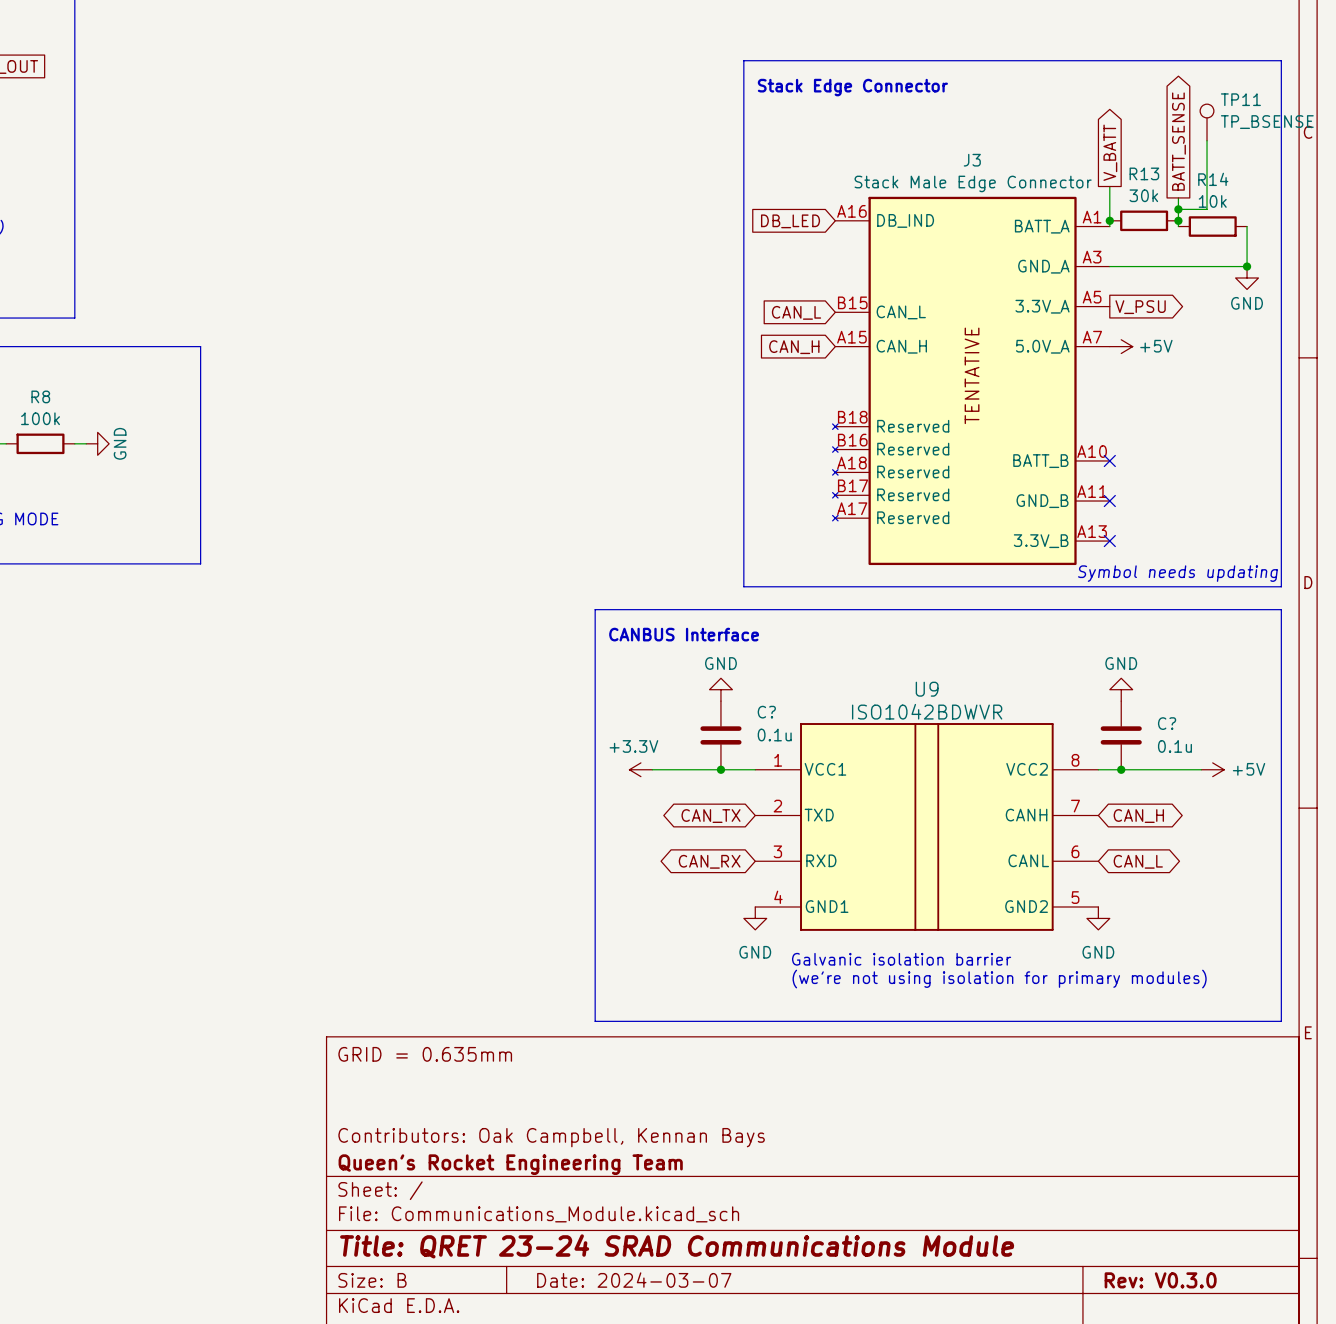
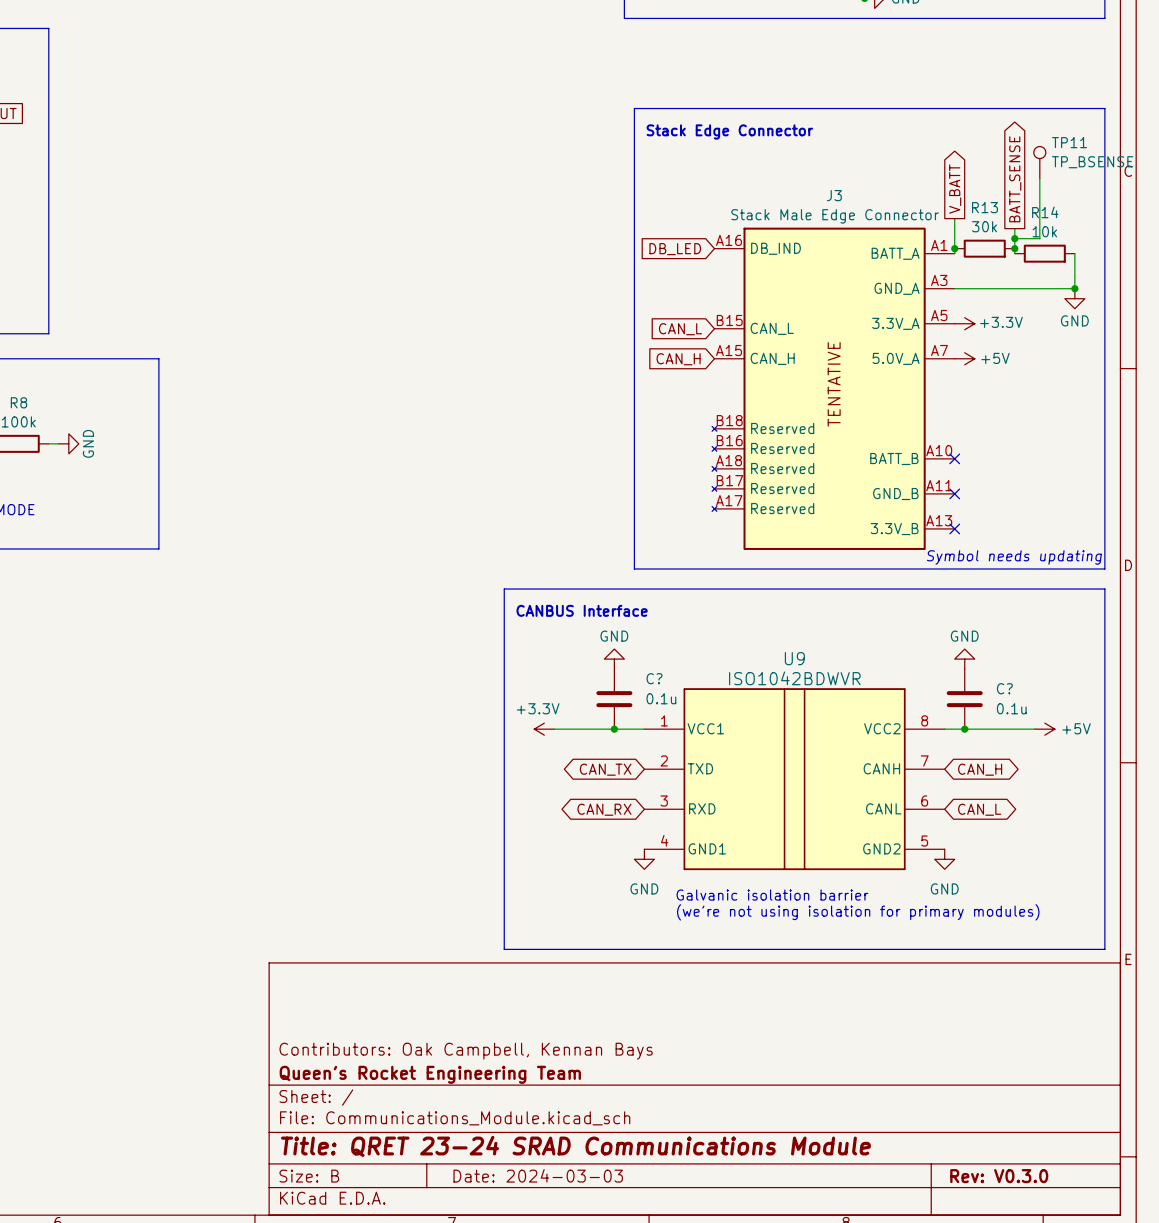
power symbol: none -> +3.3V (964, 323)
global label: V_PSU (1140, 307) -> none
title block: GRID = 0.635mm (425, 1054) -> none
title block: Date: 2024-03-07 (634, 1280) -> Date: 2024-03-03 (538, 1175)

